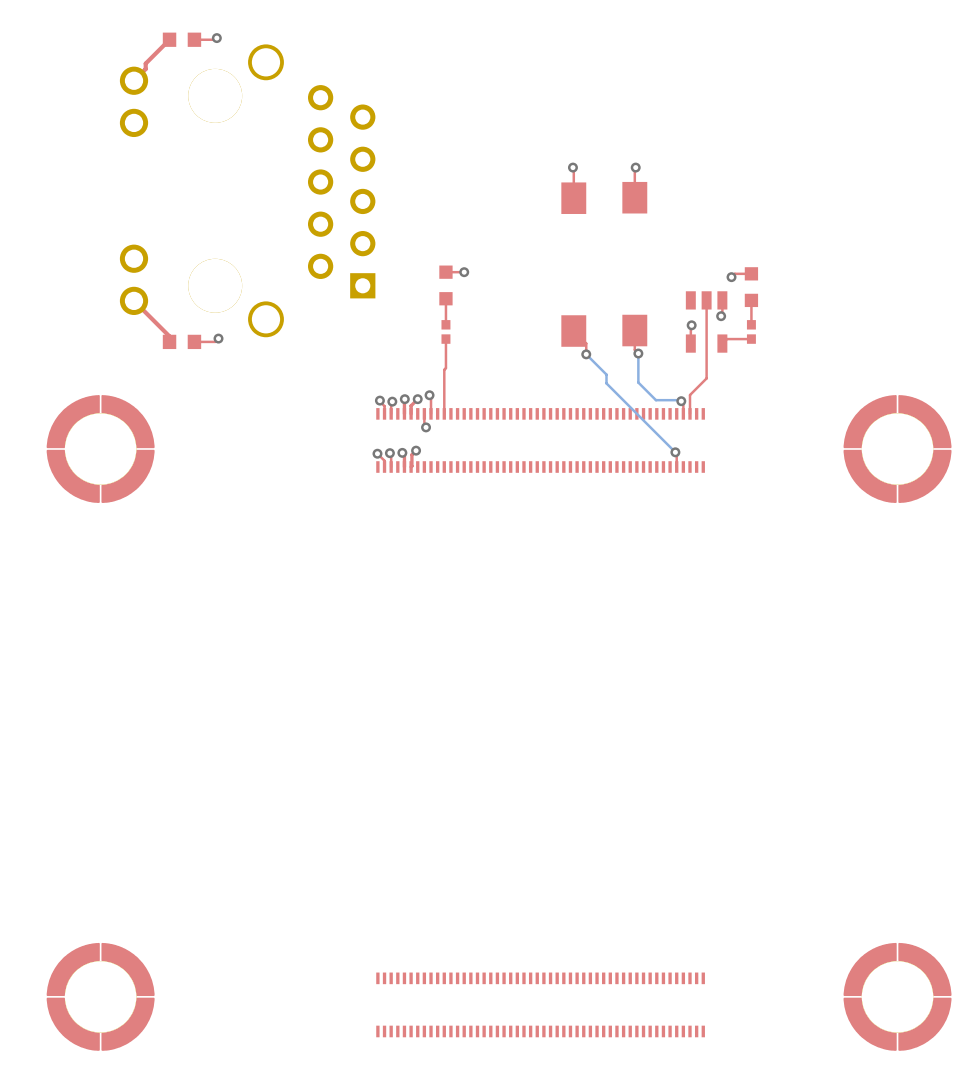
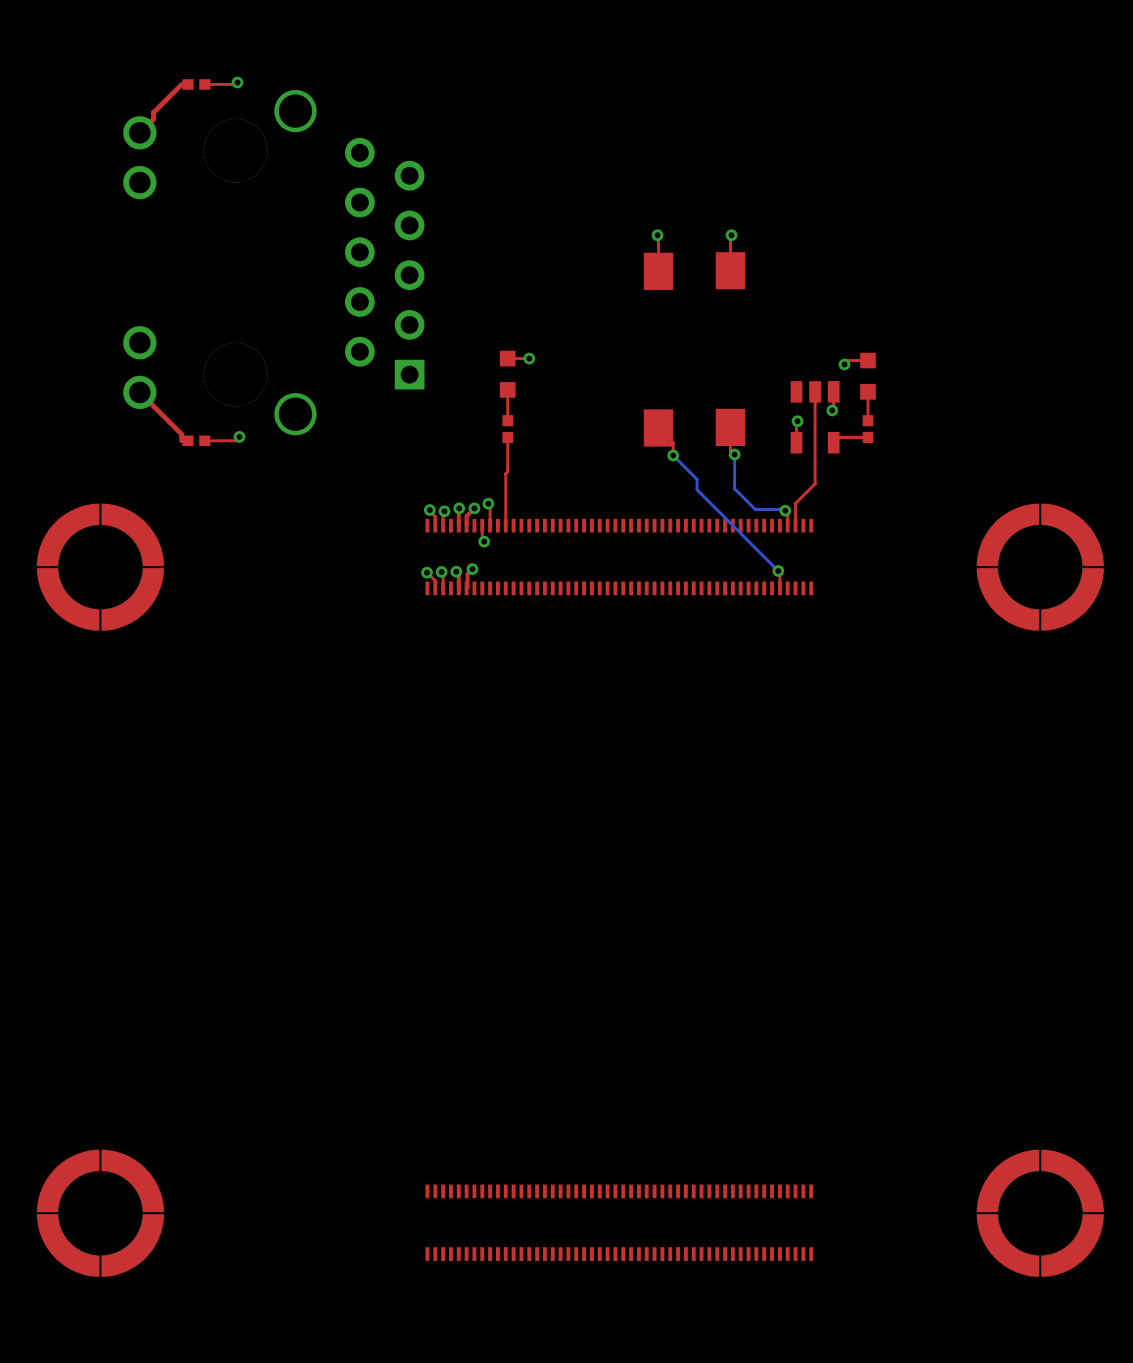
part footprint: [162, 32, 202, 47] -> [182, 79, 211, 90]
part footprint: [162, 334, 202, 350] -> [182, 435, 211, 447]

